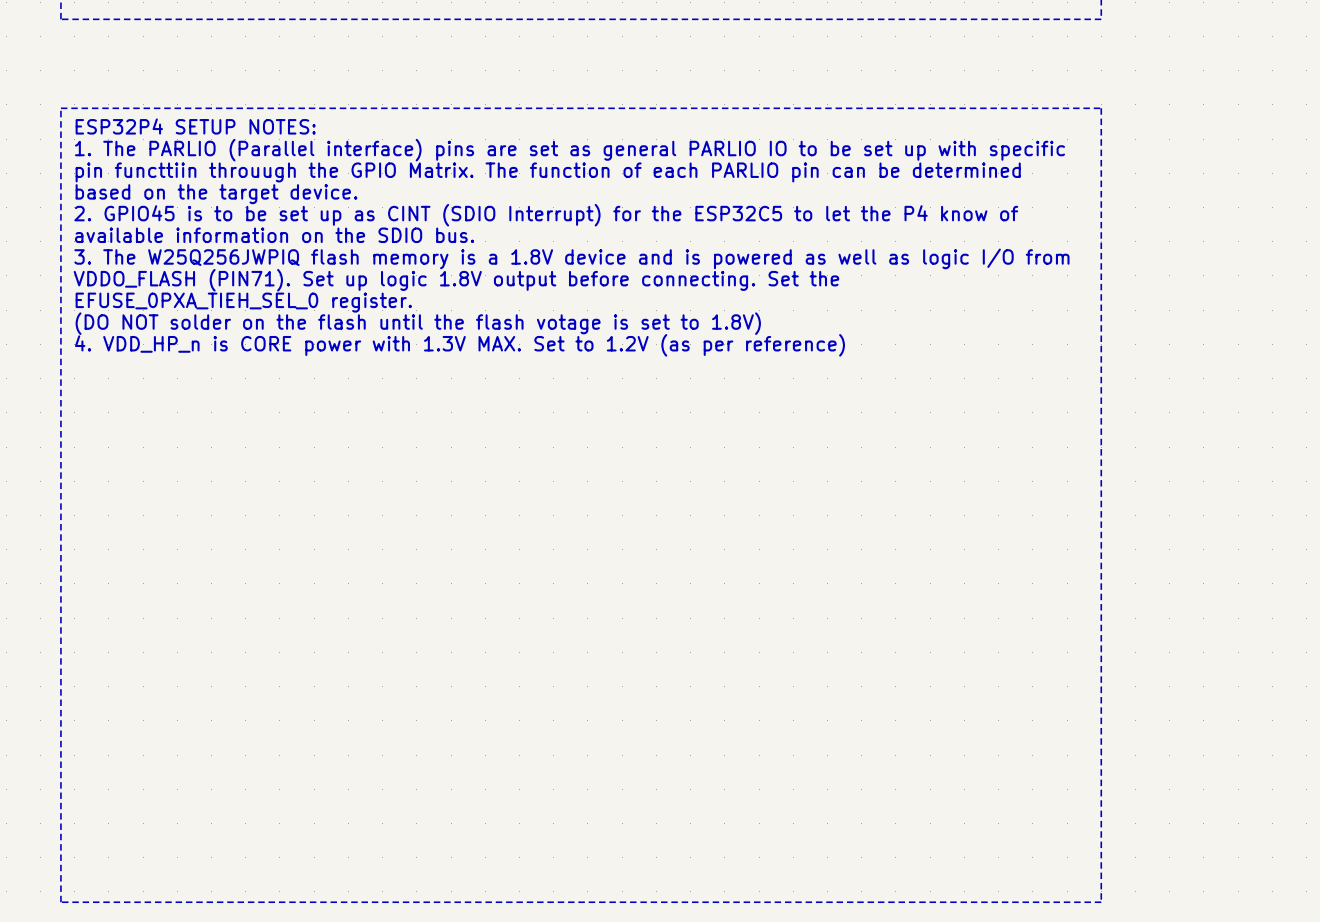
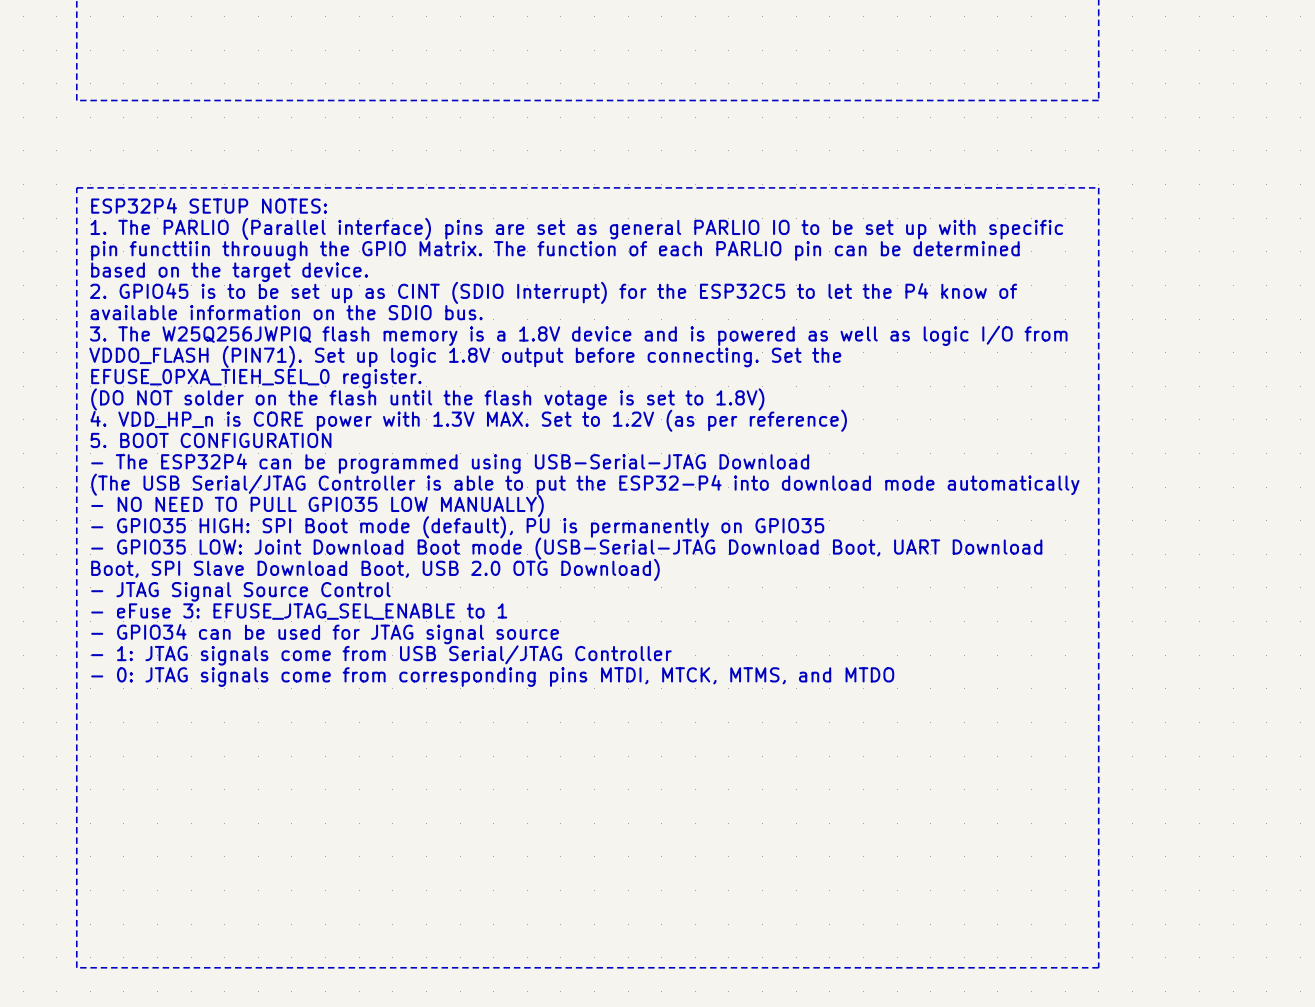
text: none -> 5. BOOT CONFIGURATION (210, 440)
text: none -> - The ESP32P4 can be programmed using USB-Serial-JTAG Download (450, 463)
text: none -> (The USB Serial/JTAG Controller is able to put the ESP32-P4 into download mode automatically (585, 484)
text: none -> - NO NEED TO PULL GPIO35 LOW MANUALLY) (317, 505)
text: none -> - GPIO35 HIGH: SPI Boot mode (default), PU is permanently on GPIO35 (457, 527)
text: none -> - GPIO35 LOW: Joint Download Boot mode (USB-Serial-JTAG Download Boot, UART Download (566, 548)
text: none -> Boot, SPI Slave Download Boot, USB 2.0 OTG Download) (375, 569)
text: none -> - JTAG Signal Source Control (240, 591)
text: none -> - eFuse 3: EFUSE_JTAG_SEL_ENABLE to 1 (299, 611)
text: none -> - GPIO34 can be used for JTAG signal source (325, 634)
text: none -> - 1: JTAG signals come from USB Serial/JTAG Controller (381, 655)
text: none -> - 0: JTAG signals come from corresponding pins MTDI, MTCK, MTMS, and MTDO (492, 677)

